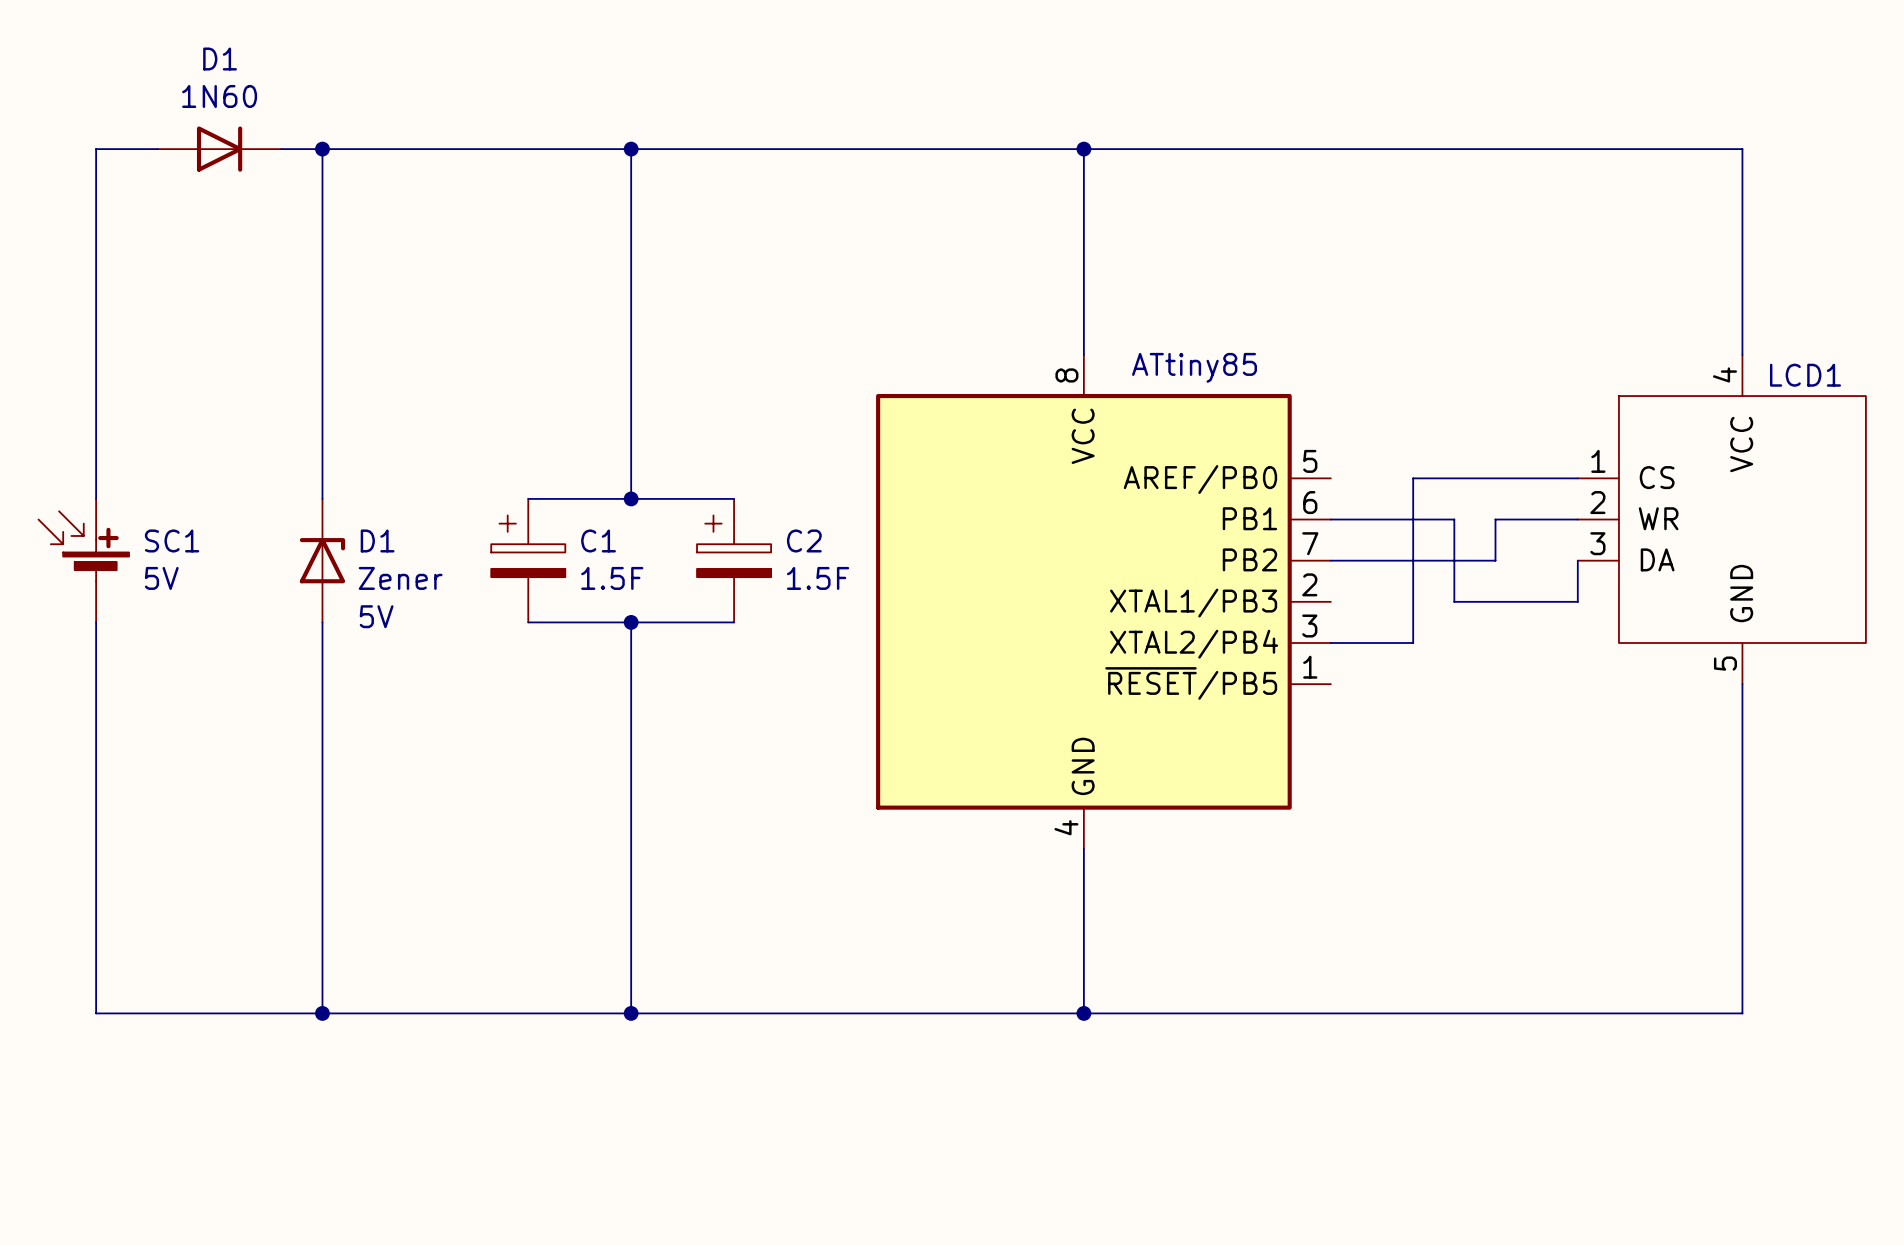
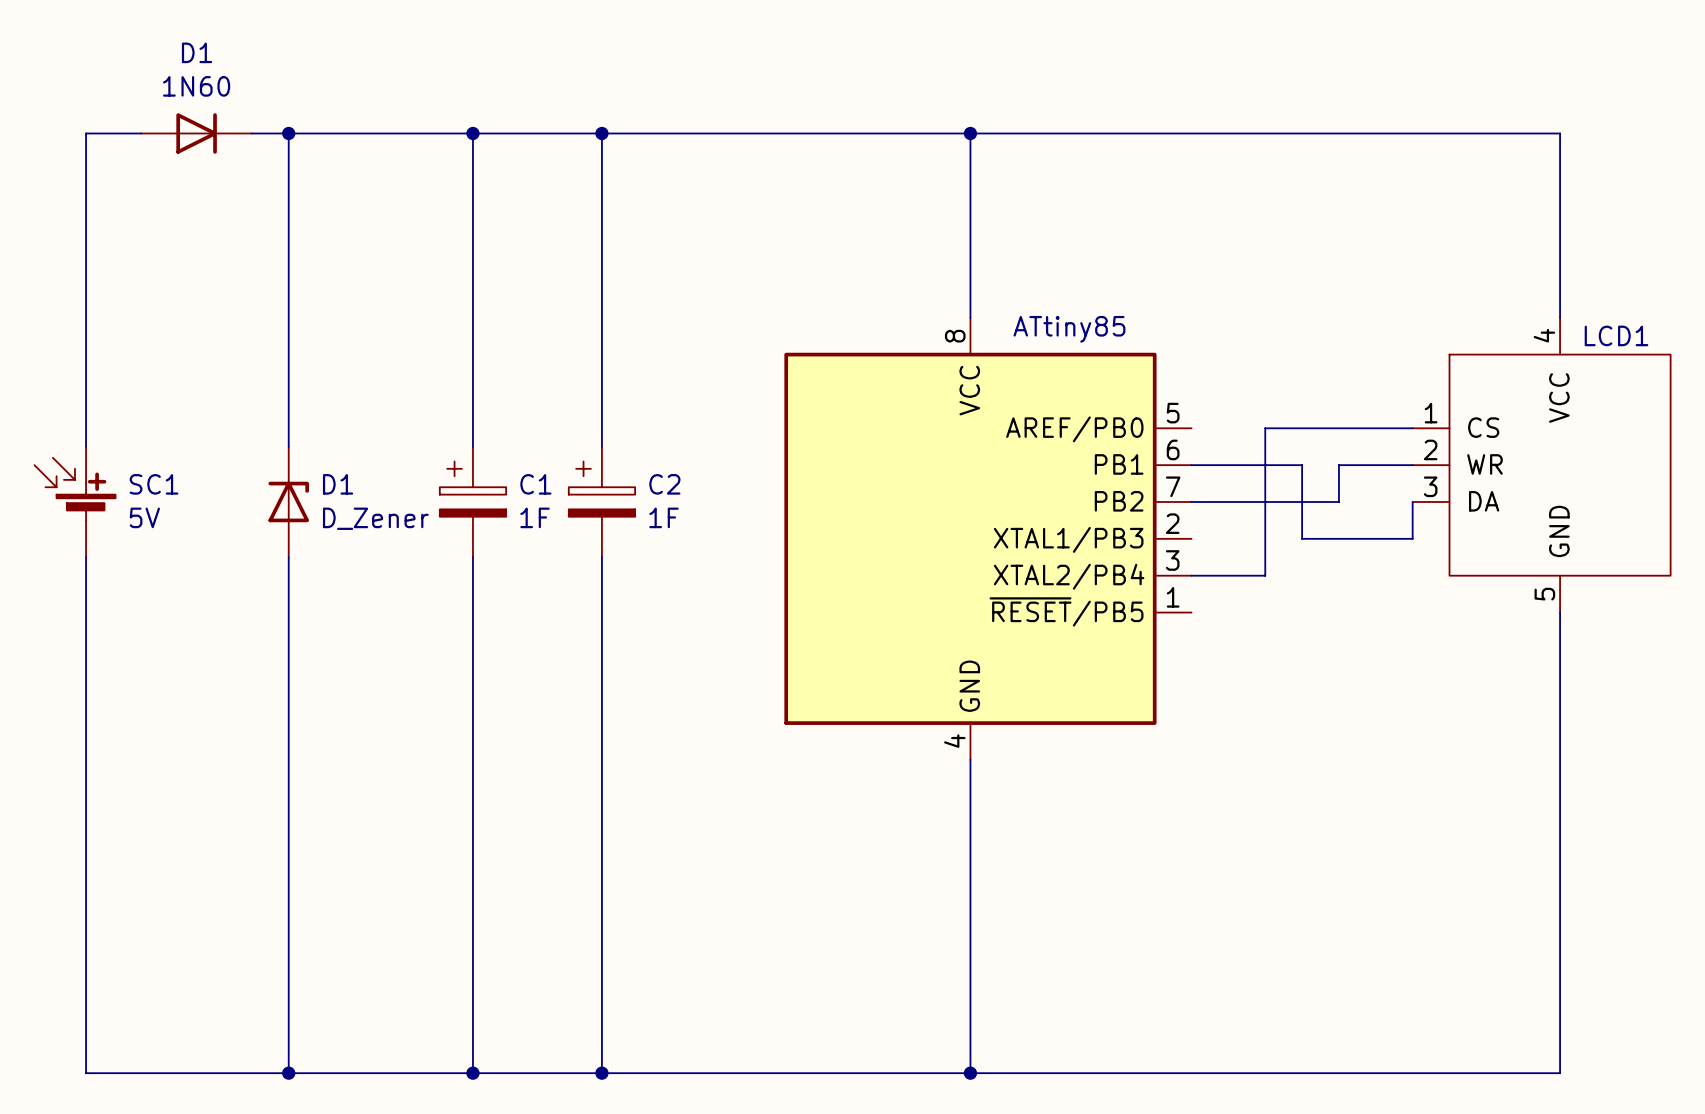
junction: none -> (472, 133)
wire: (631, 149) (631, 498) -> (601, 133) (601, 446)
junction position: (631, 149) -> (601, 133)
wire: (528, 498) (734, 498) -> (472, 446) (472, 133)
junction: (631, 498) -> none
C2 position: (734, 560) -> (601, 501)
D1 value: Zener (400, 578) -> D_Zener (375, 518)
C1 value: 1.5F (612, 578) -> 1F (535, 517)
C2 value: 1.5F (818, 578) -> 1F (663, 517)
D1 text: 5V (376, 616) -> none
wire: (528, 622) (734, 622) -> (472, 557) (472, 1073)
wire: (631, 622) (631, 1013) -> none
junction: (631, 622) -> none
wire: none -> (601, 557) (601, 1073)
wire: (96, 1013) (1742, 1013) -> (86, 907) (86, 1073) (1560, 1073) (1560, 907)
wire: none -> (288, 907) (288, 1073)
junction: (322, 1013) -> none
junction: (631, 1013) -> none
wire: none -> (970, 907) (970, 1073)
junction: (1083, 1013) -> none
junction: none -> (288, 1073)
junction: none -> (472, 1073)
junction: none -> (601, 1073)
junction: none -> (970, 1073)

